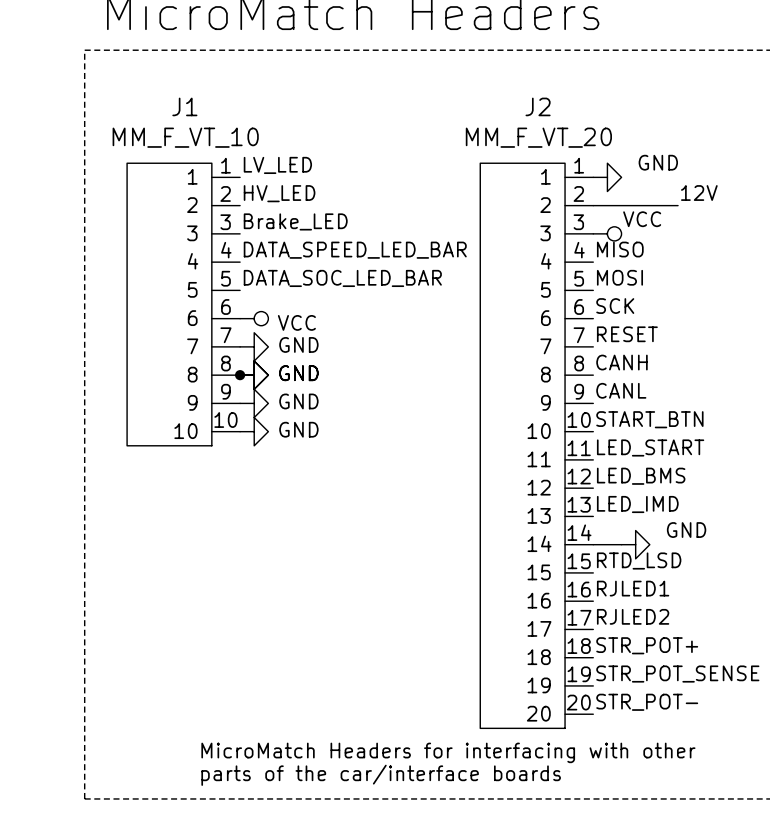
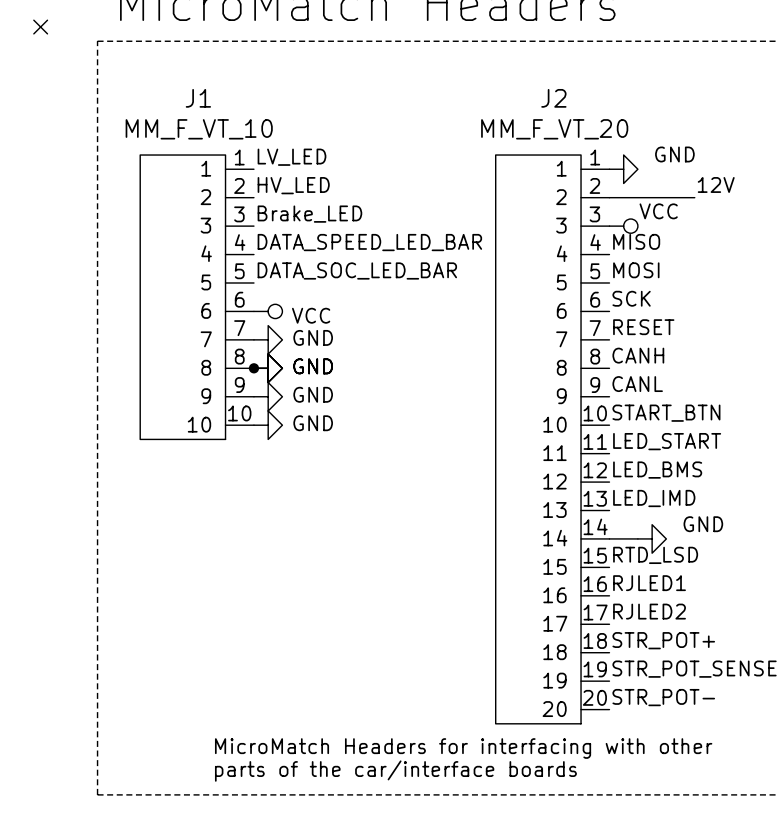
no-connect mark: none -> (40, 27)

